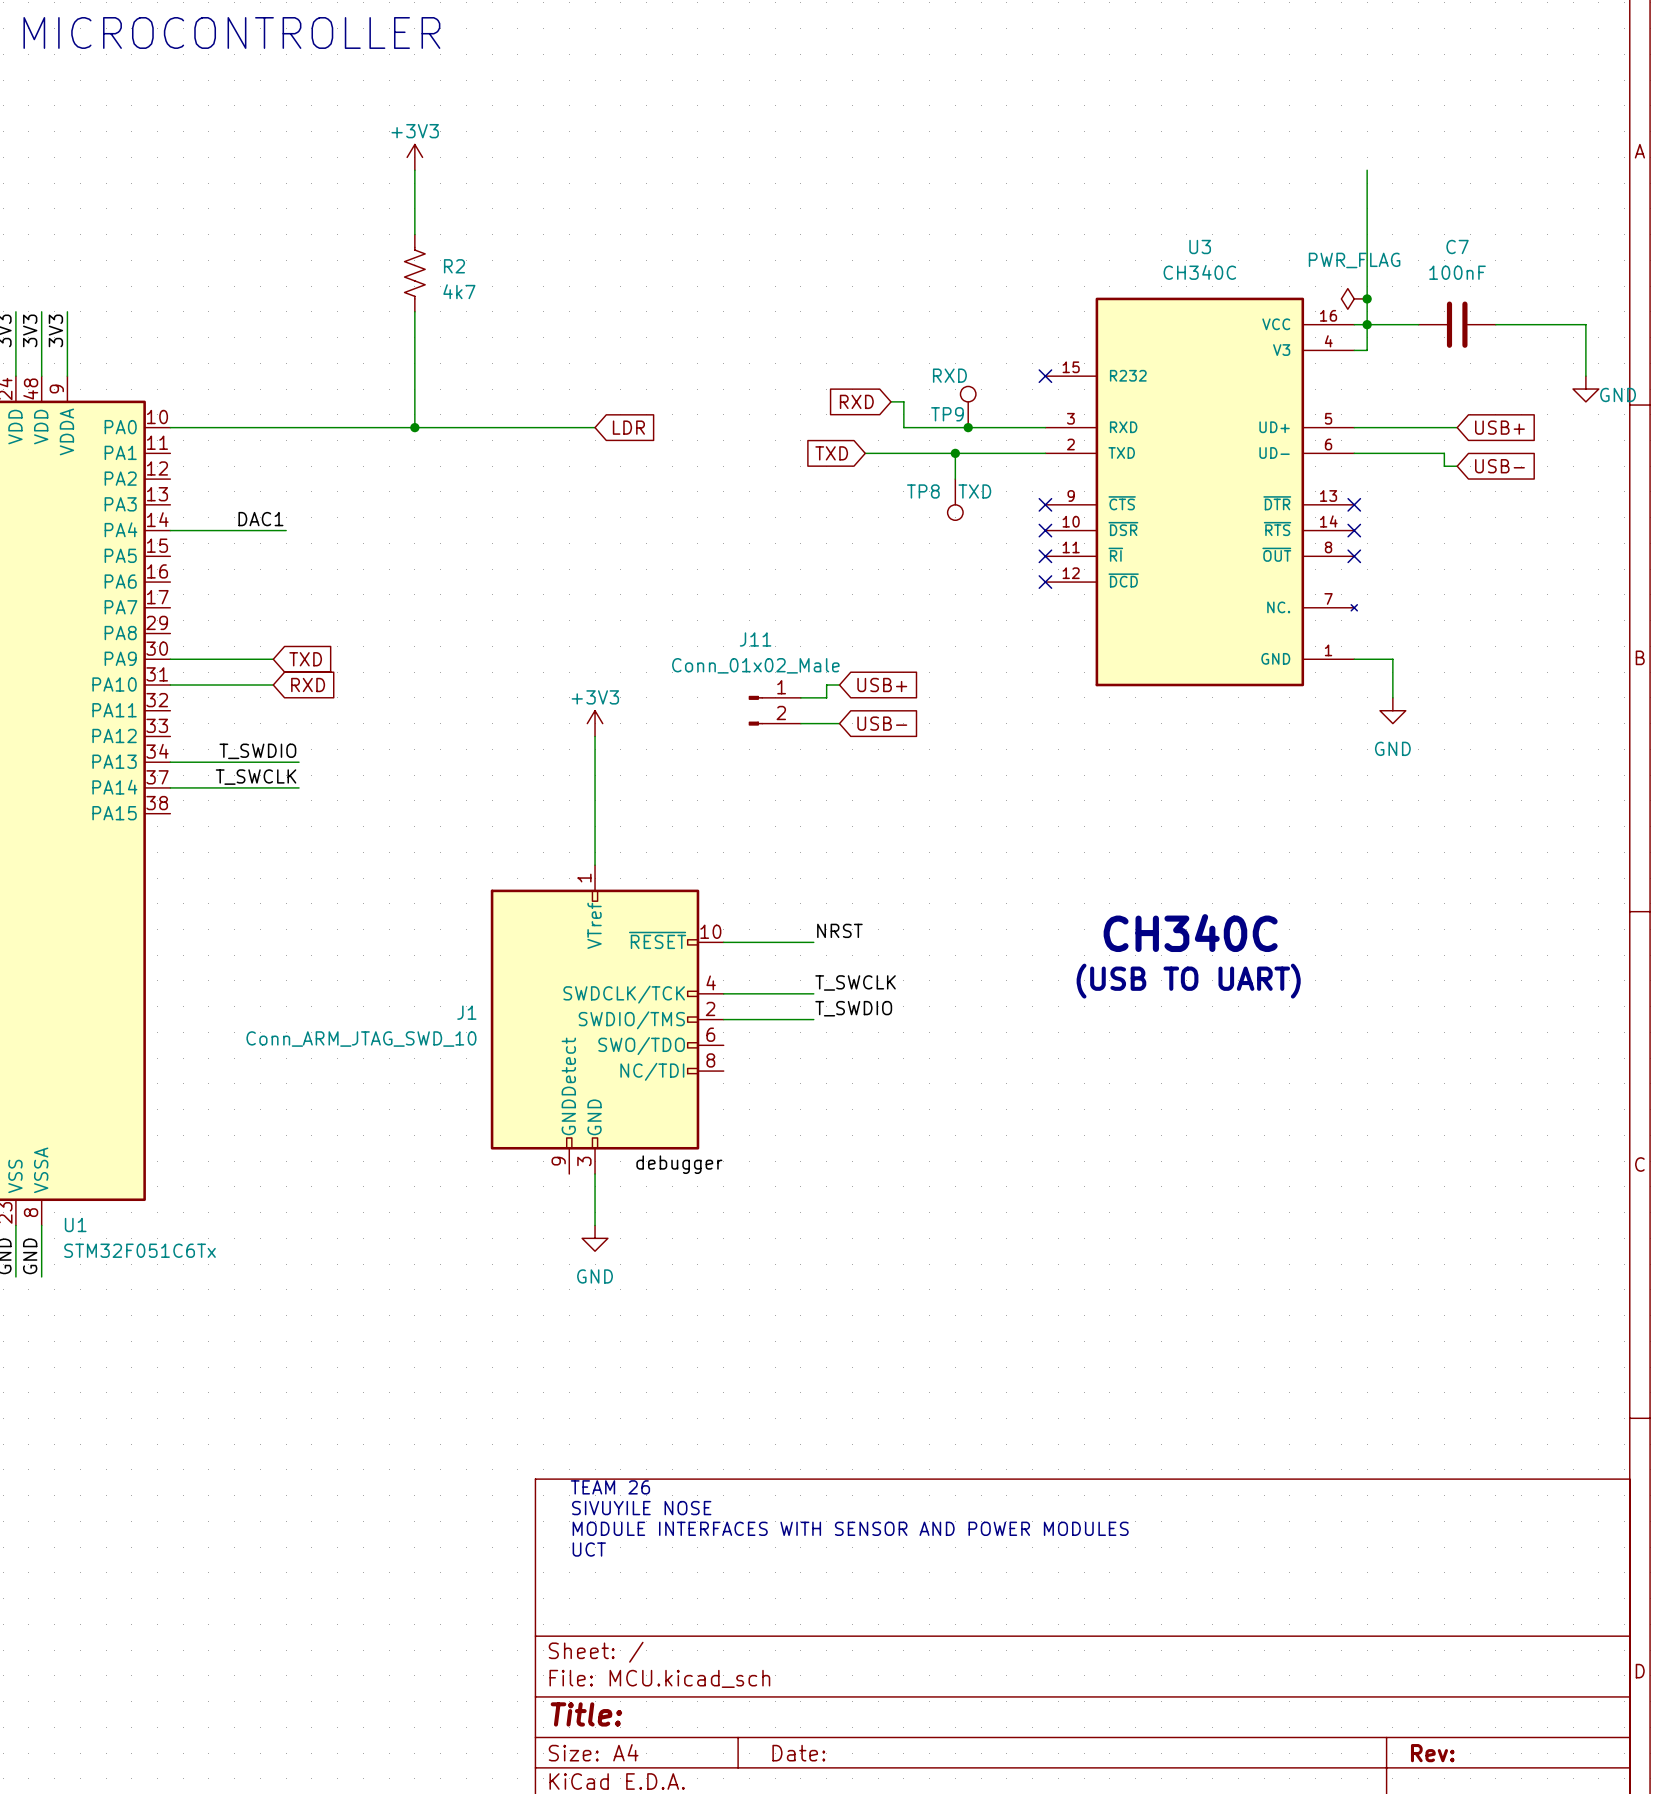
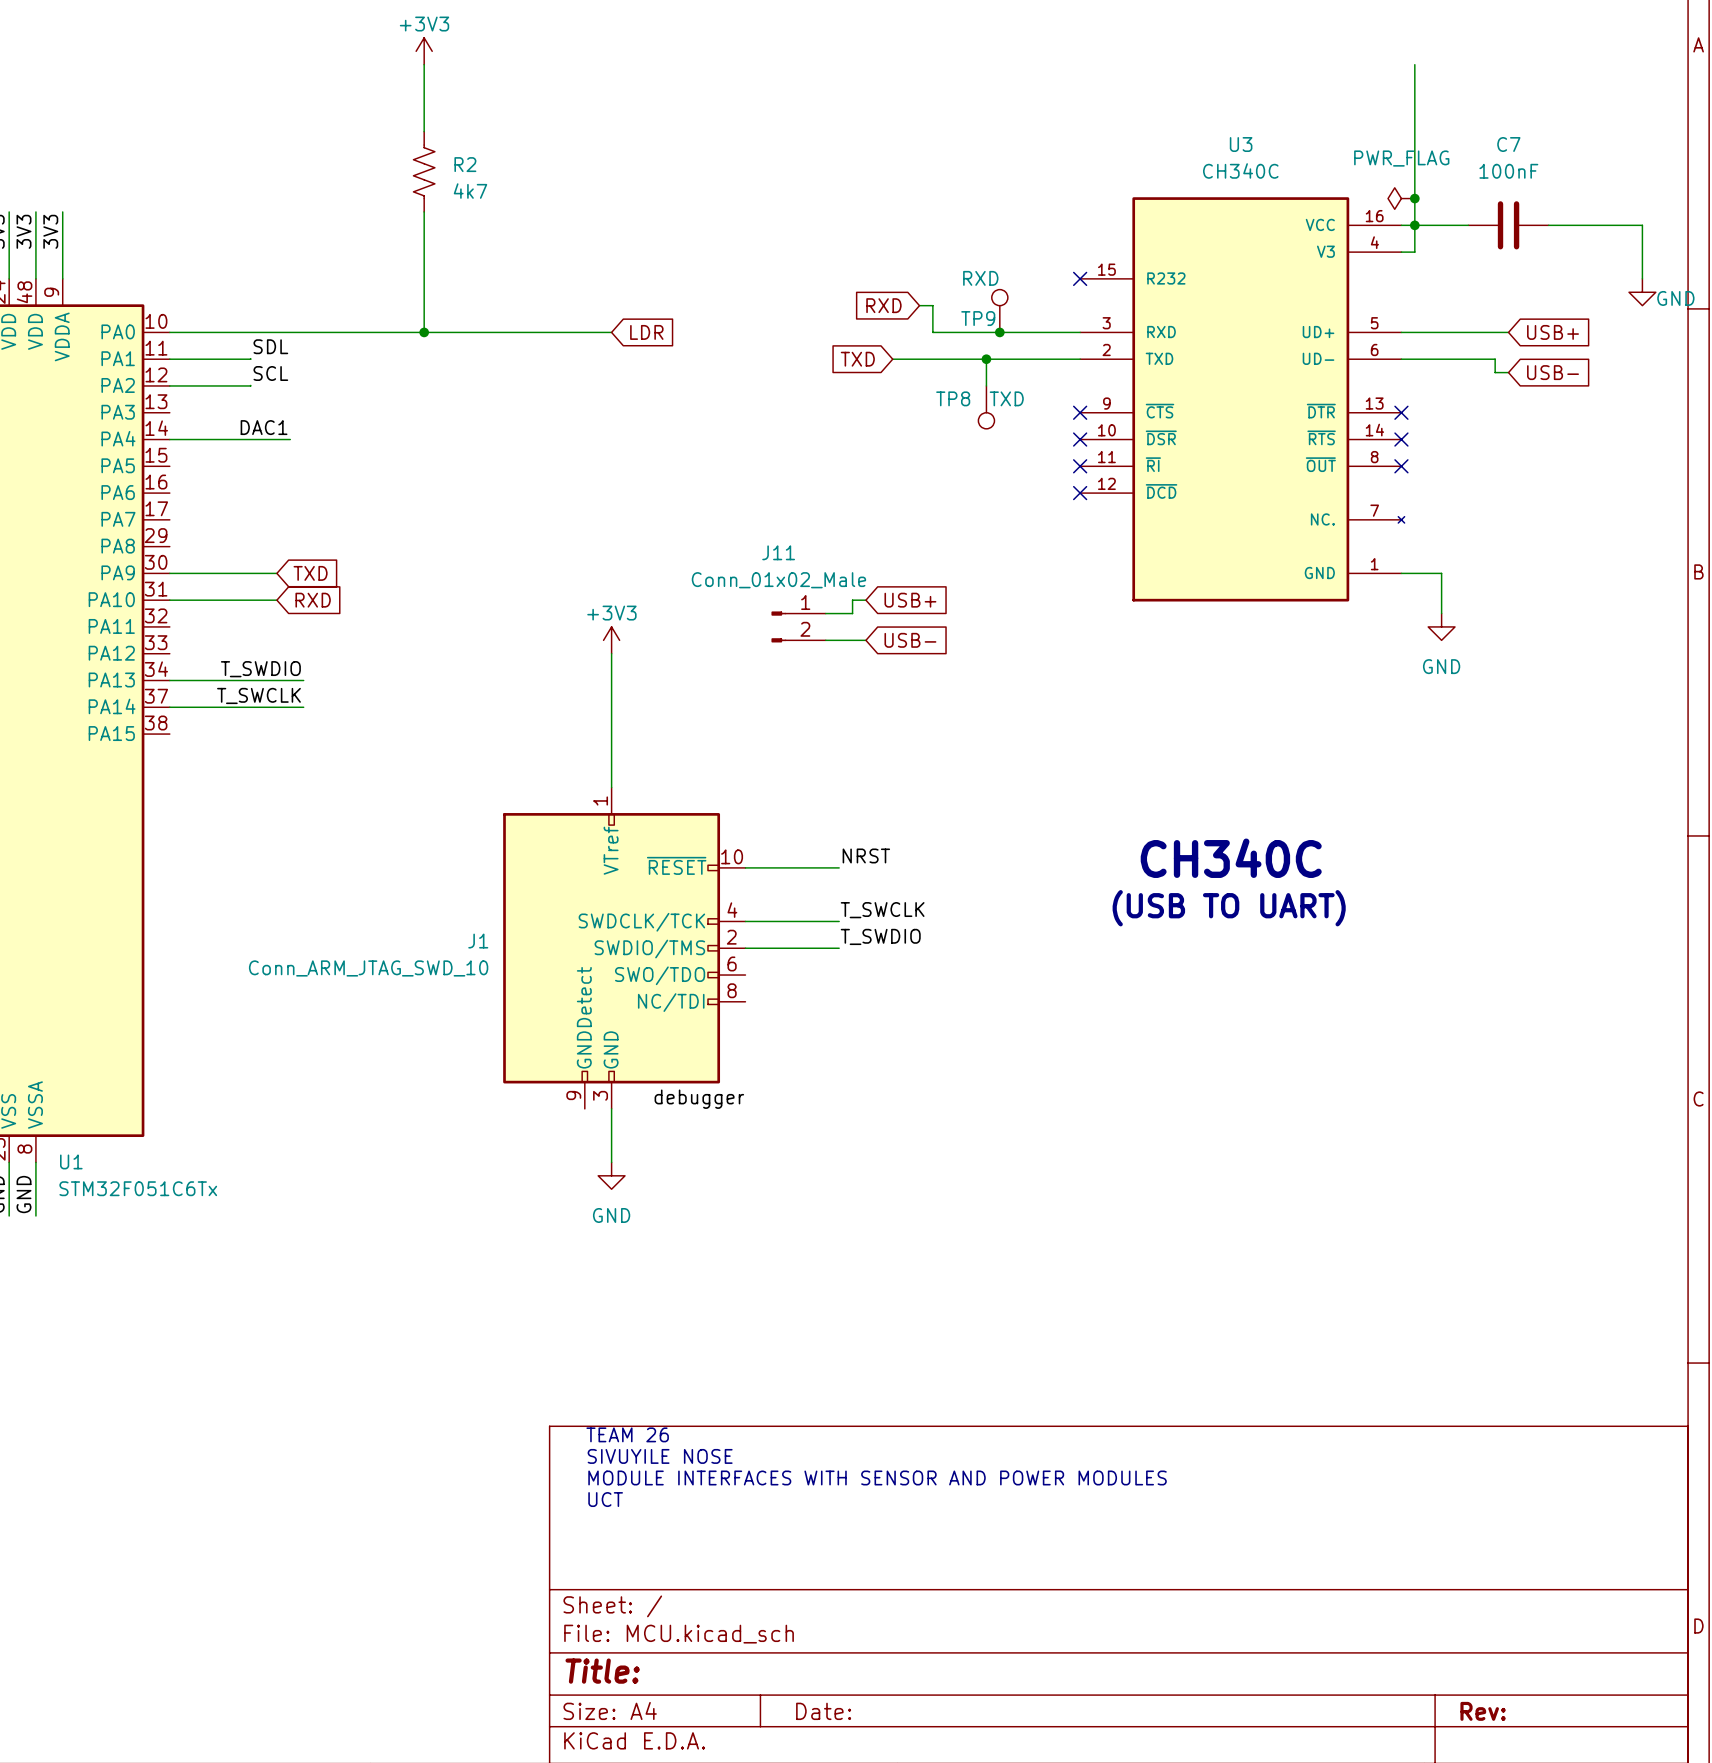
label: none -> SDL (270, 346)
wire: none -> (250, 358) (169, 359)
label: none -> SCL (270, 373)
wire: none -> (250, 385) (169, 385)

